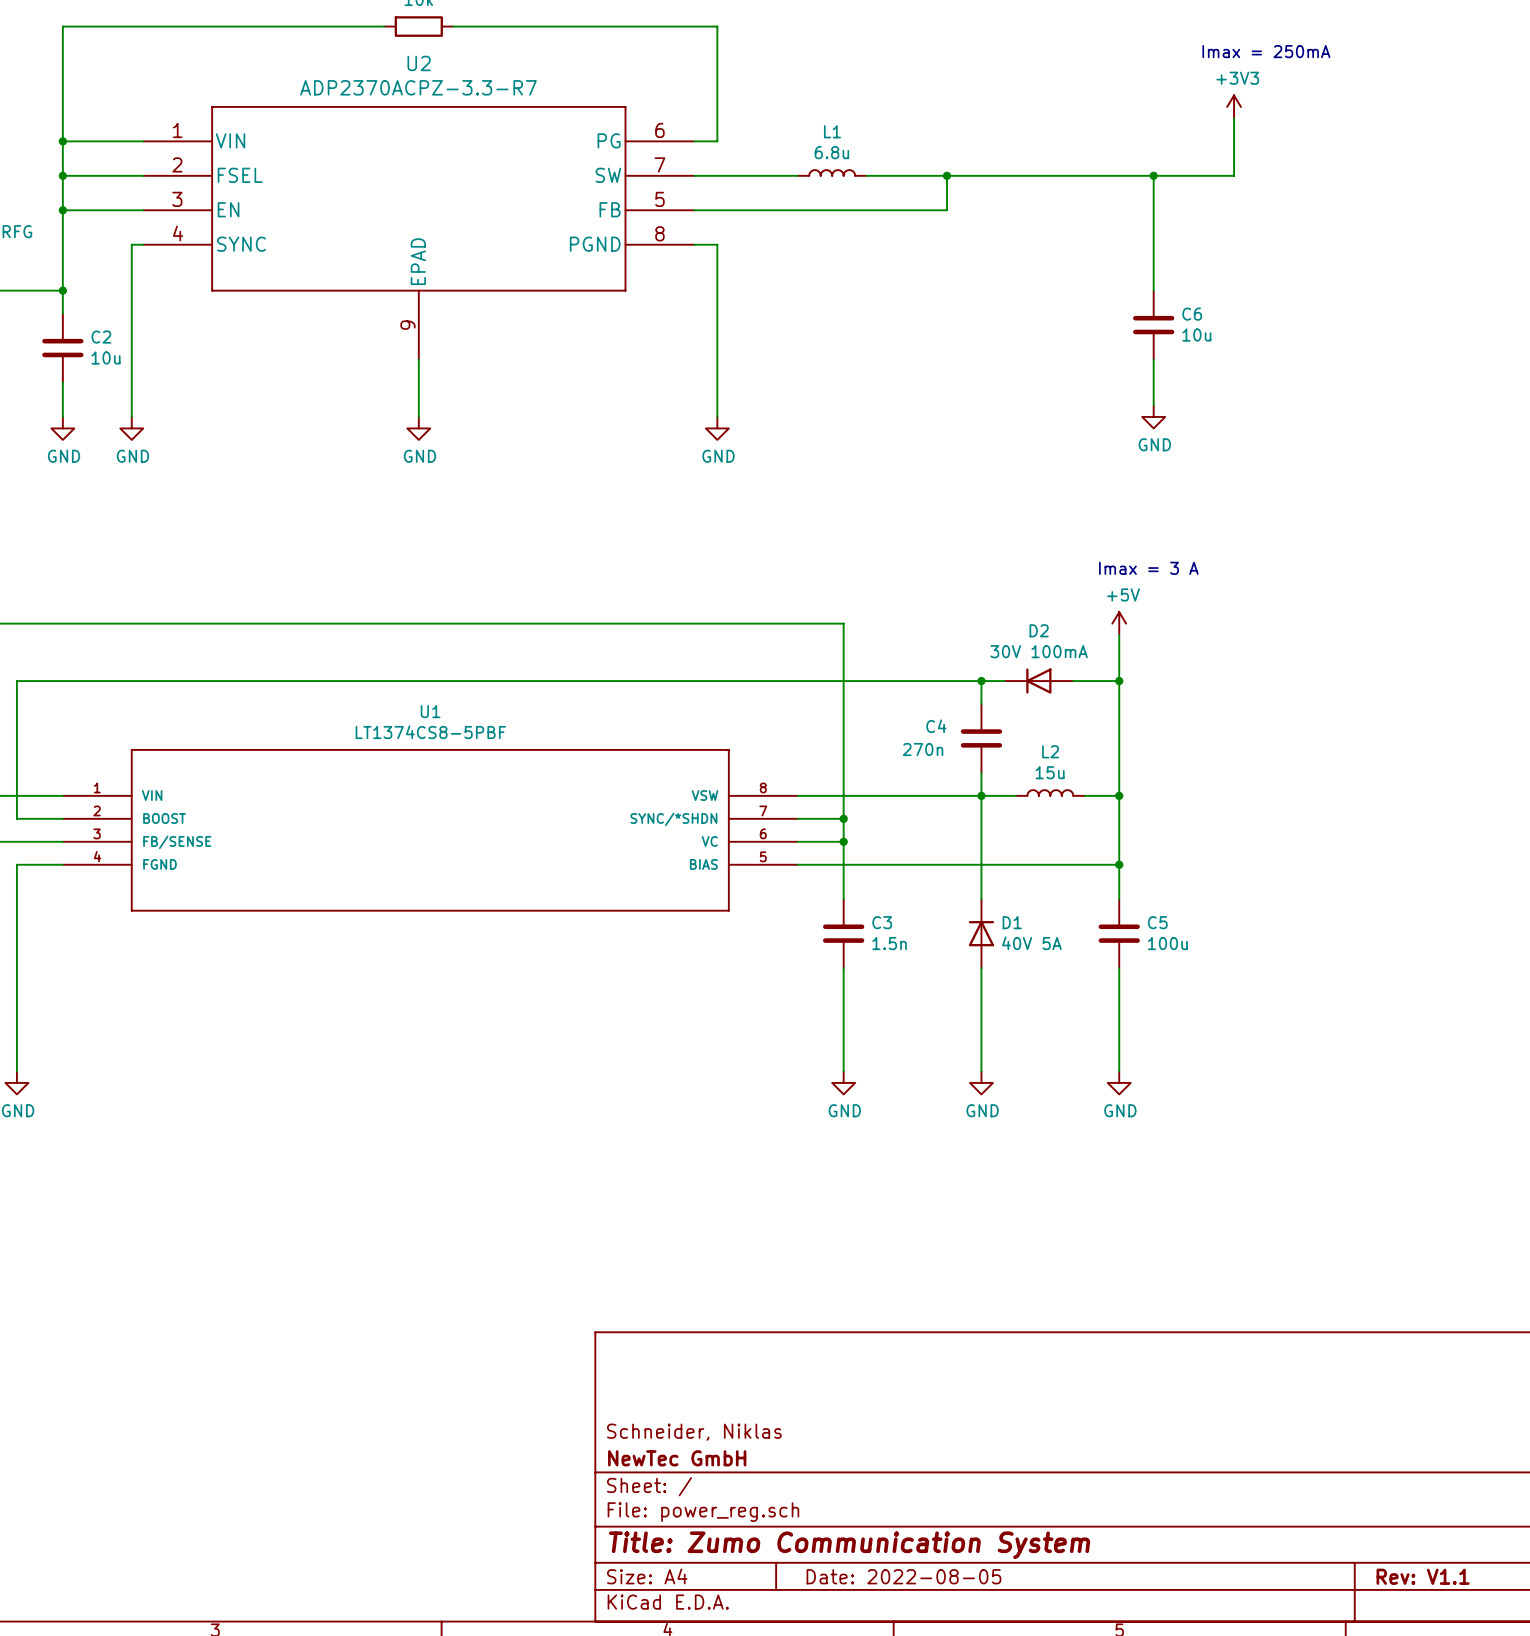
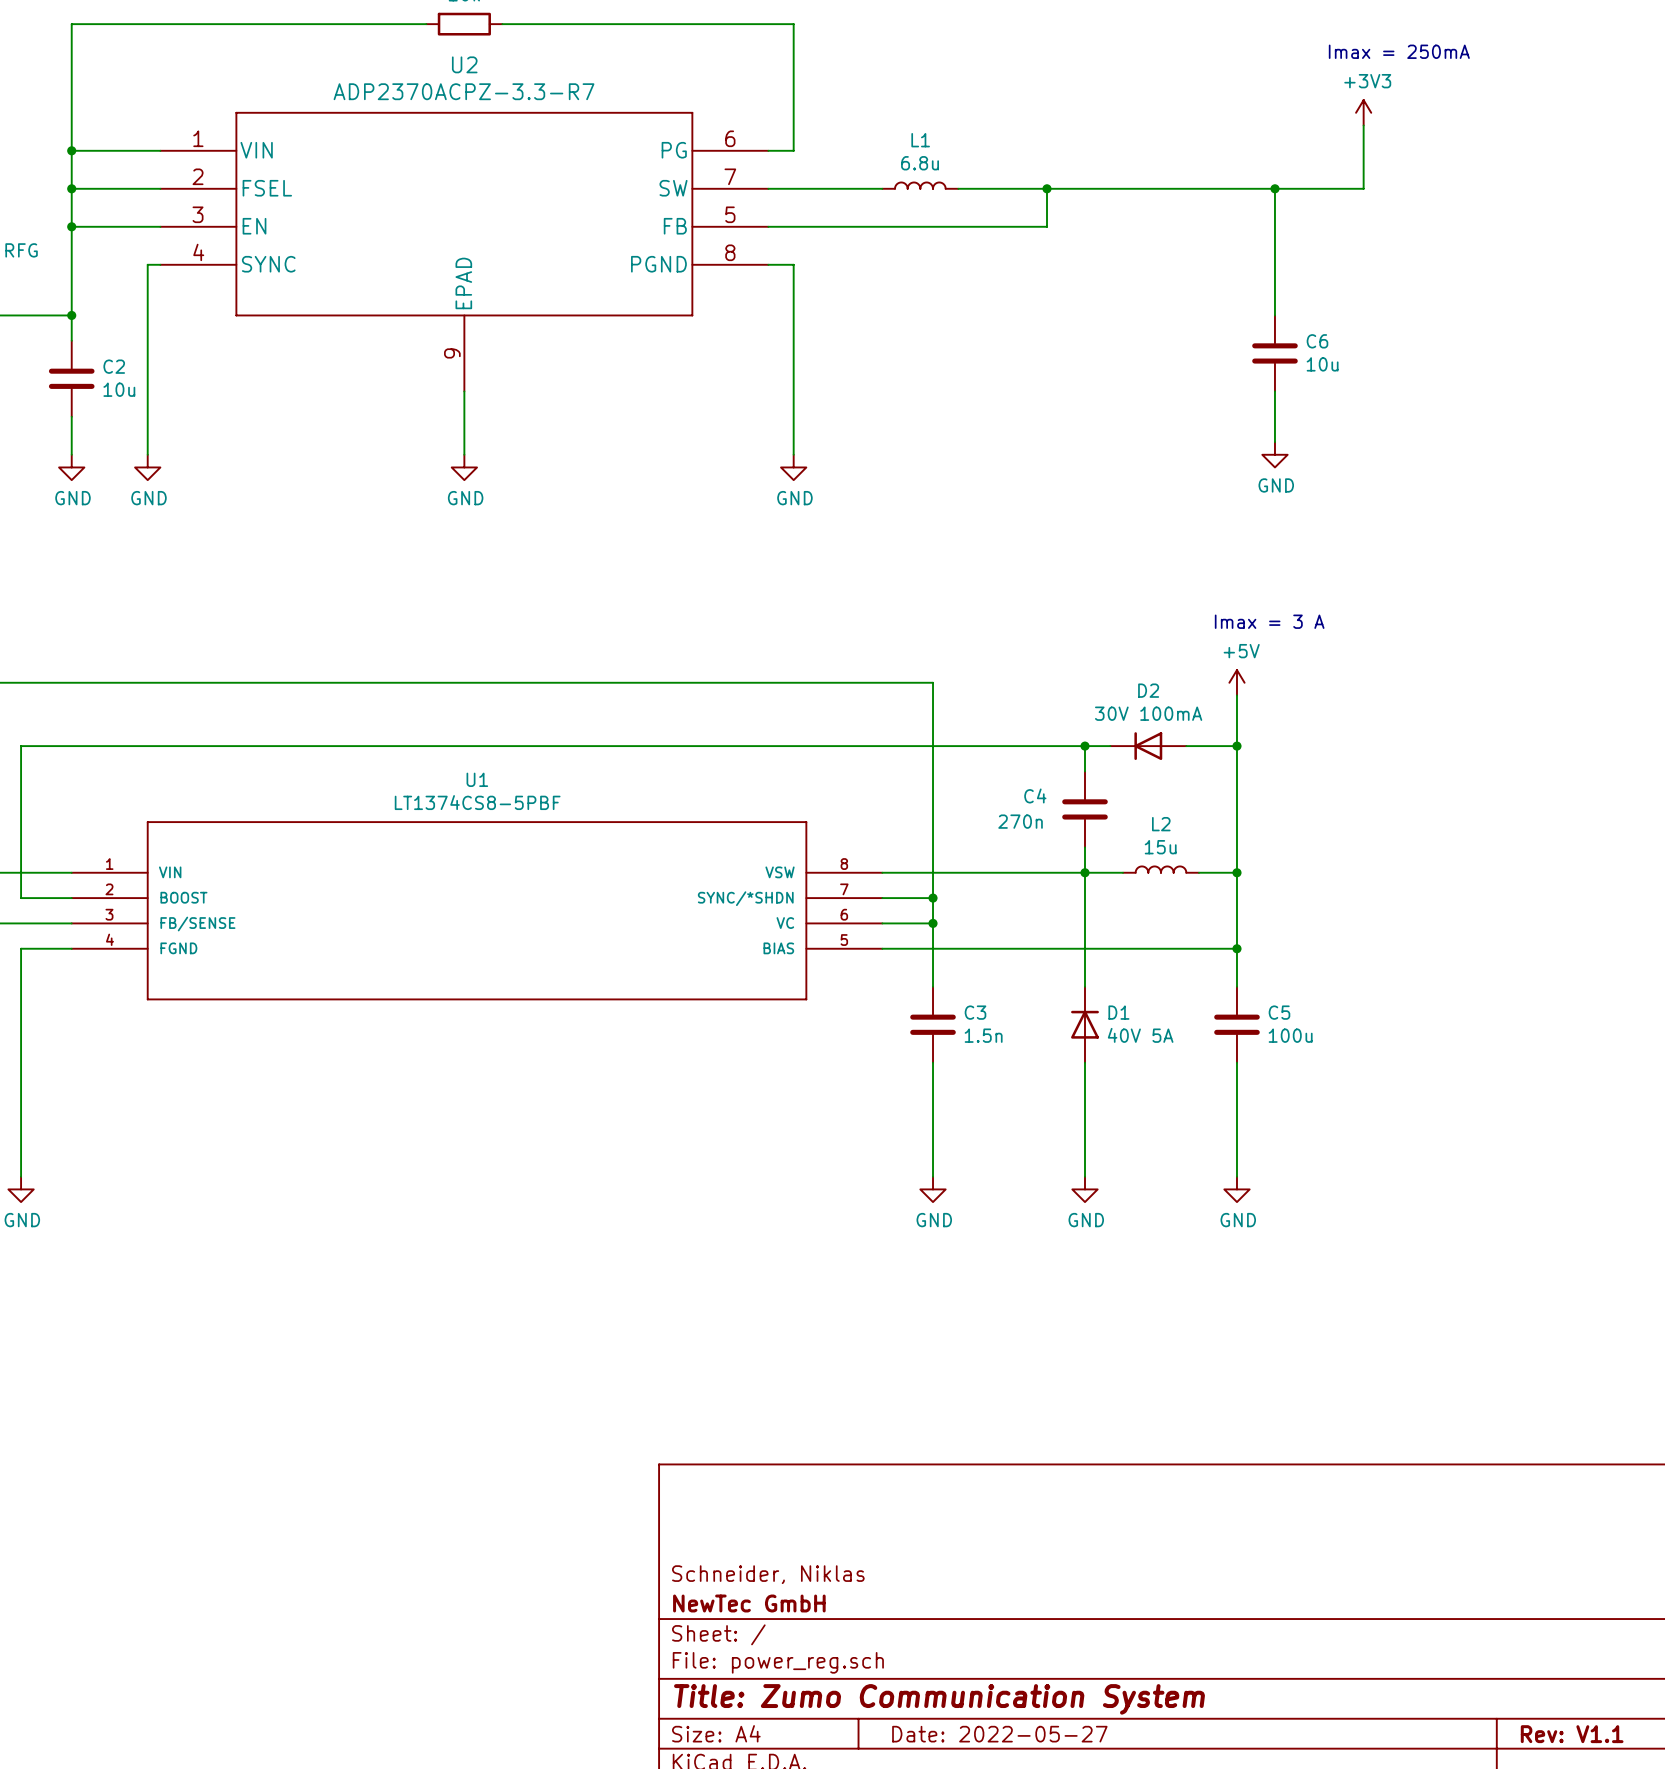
title block: Date: 2022-08-05 (903, 1576) -> Date: 2022-05-27 (999, 1734)

